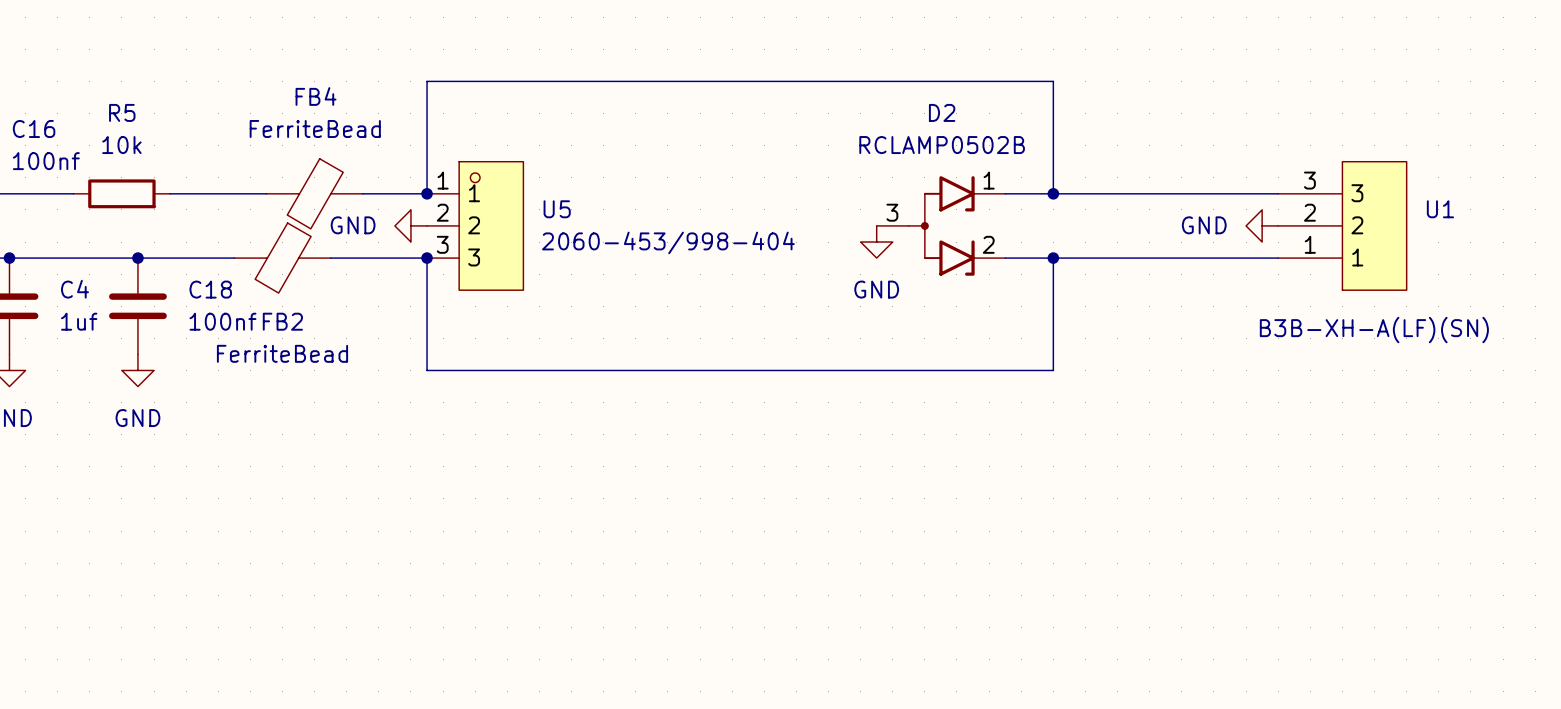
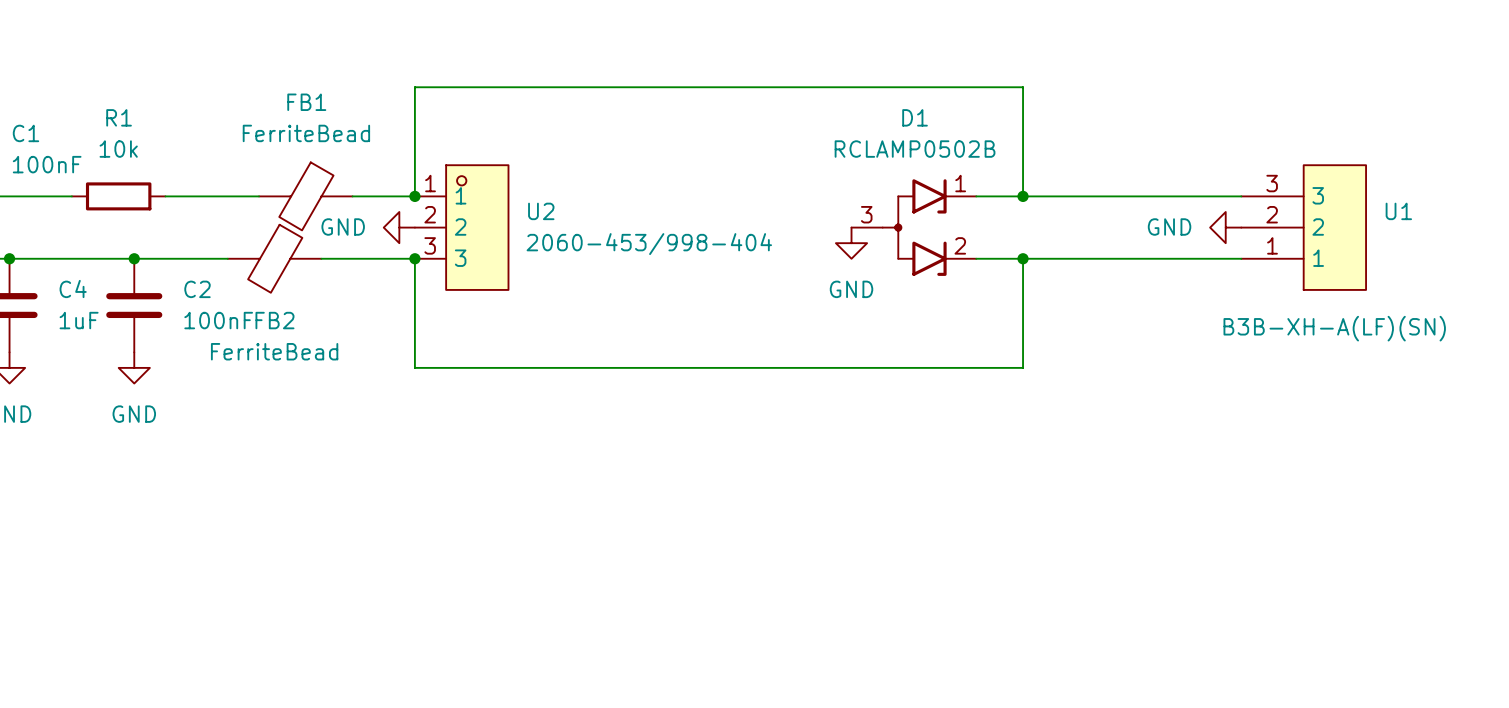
FB4 name: FB4 (316, 96) -> FB1 (306, 102)
R5 name: R5 (122, 112) -> R1 (119, 117)
D2 name: D2 (942, 112) -> D1 (915, 117)
C16 name: C16 (34, 128) -> C1 (25, 133)
C16 value: 100nf (46, 161) -> 100nF (47, 164)
U5 name: U5 (557, 209) -> U2 (541, 211)
C18 name: C18 (210, 289) -> C2 (197, 289)
C4 value: 1uf (79, 321) -> 1uF (79, 320)
C18 value: 100nf (222, 321) -> 100nF (218, 320)

